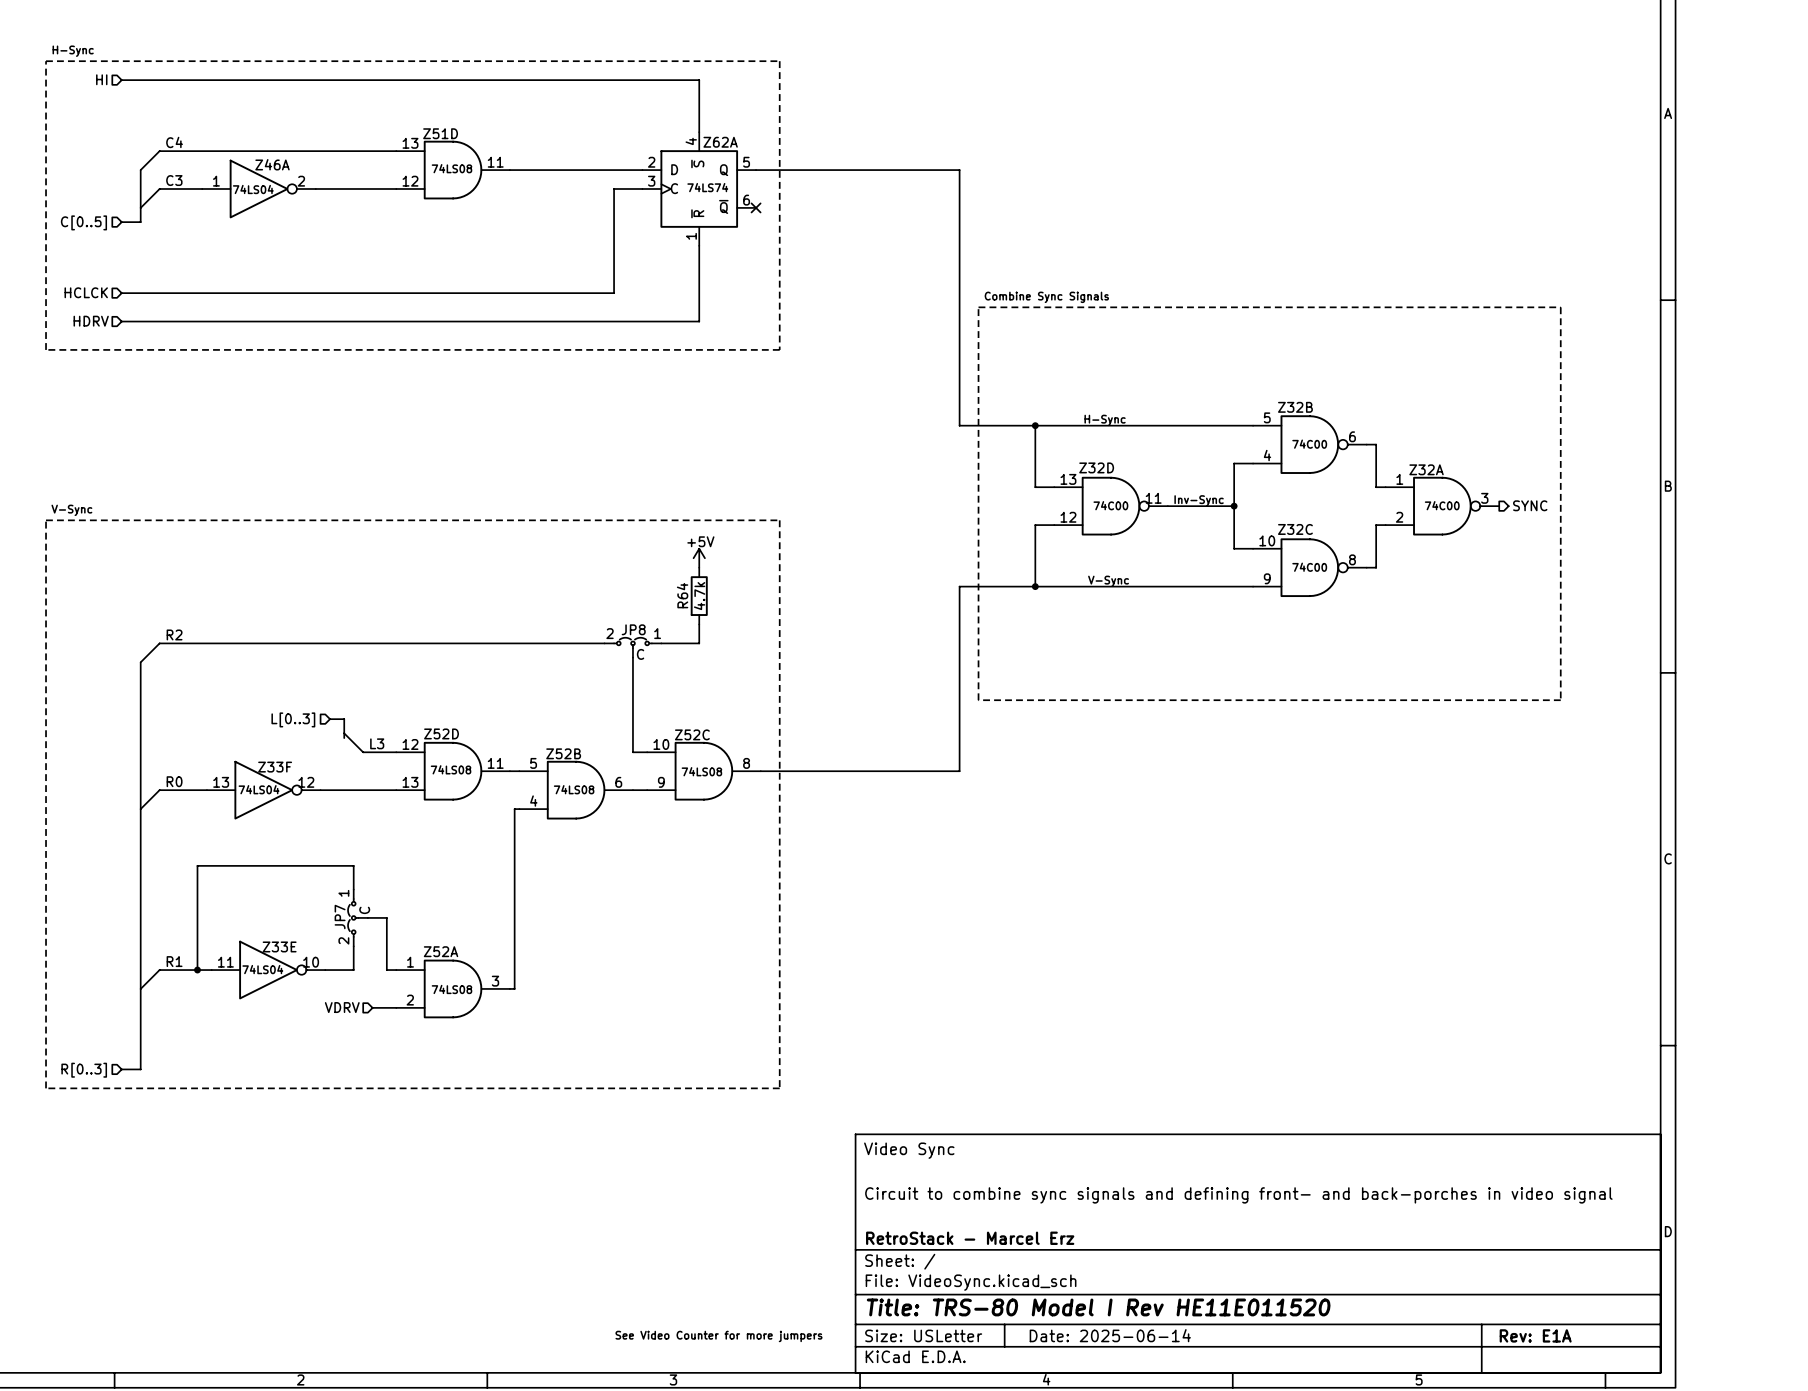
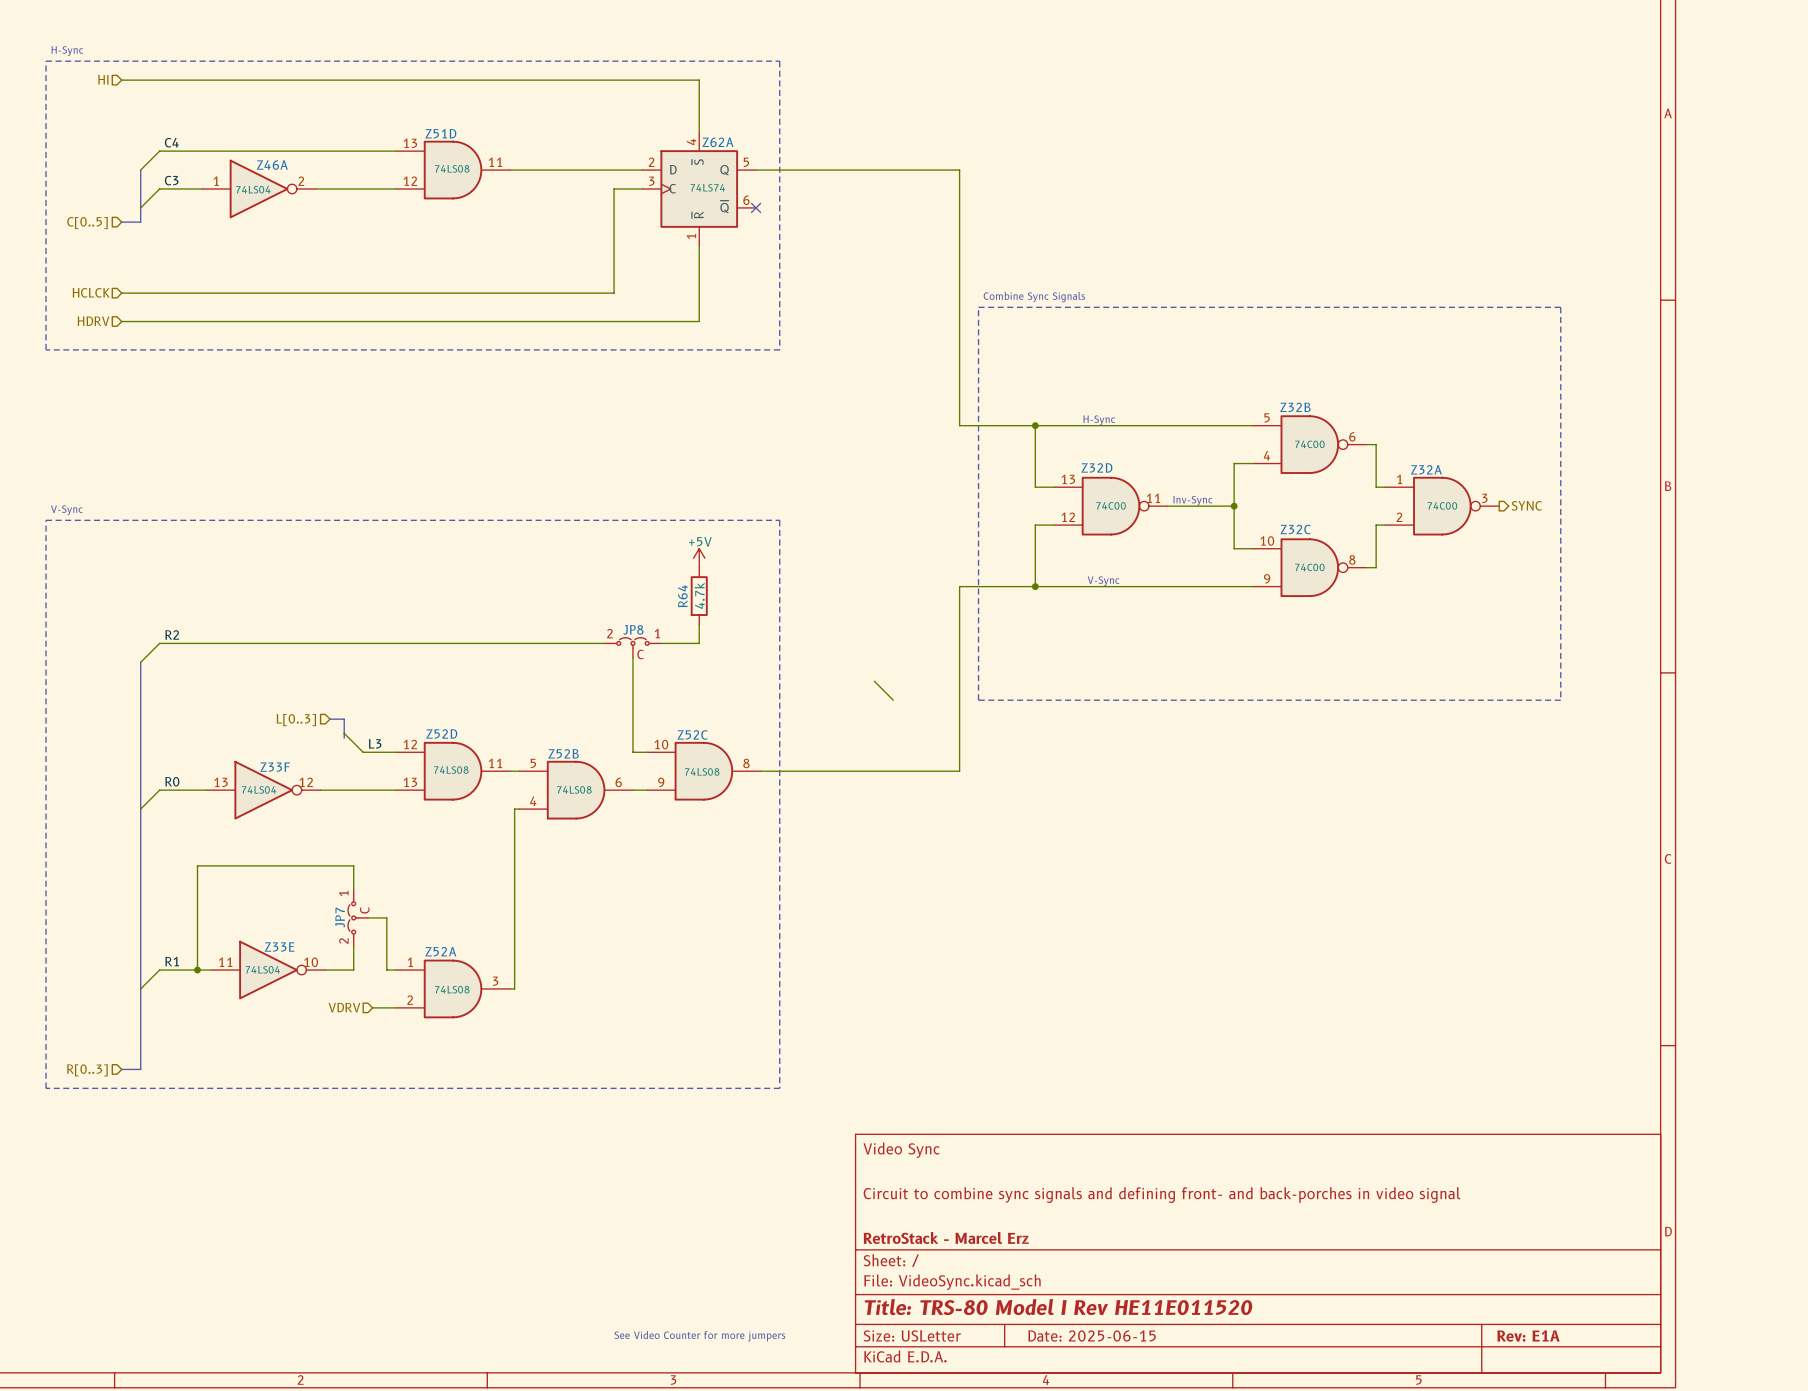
wire: none -> (874, 681) (893, 700)
title block: Date: 2025-06-14 (1110, 1335) -> Date: 2025-06-15 (1092, 1335)

